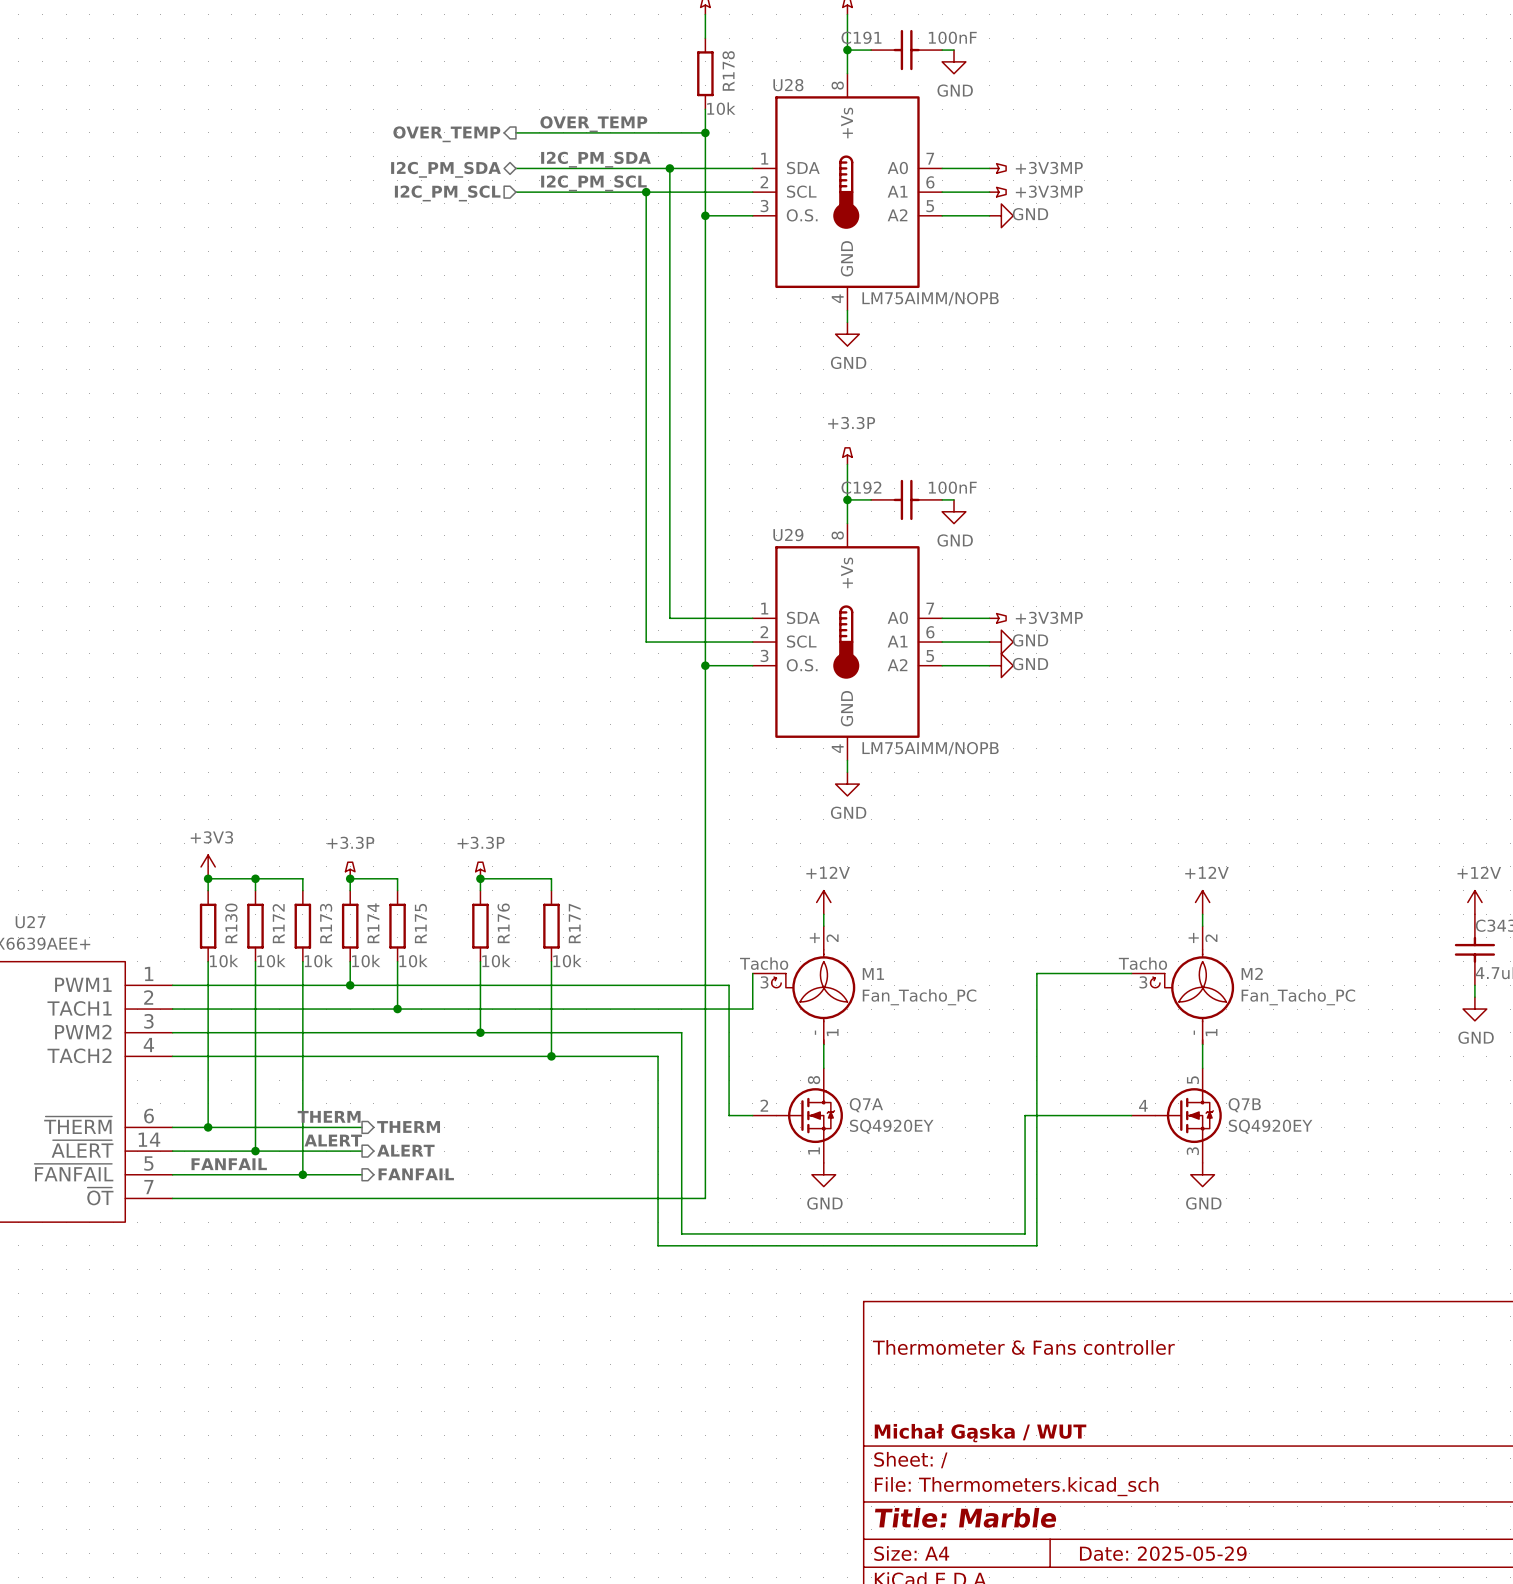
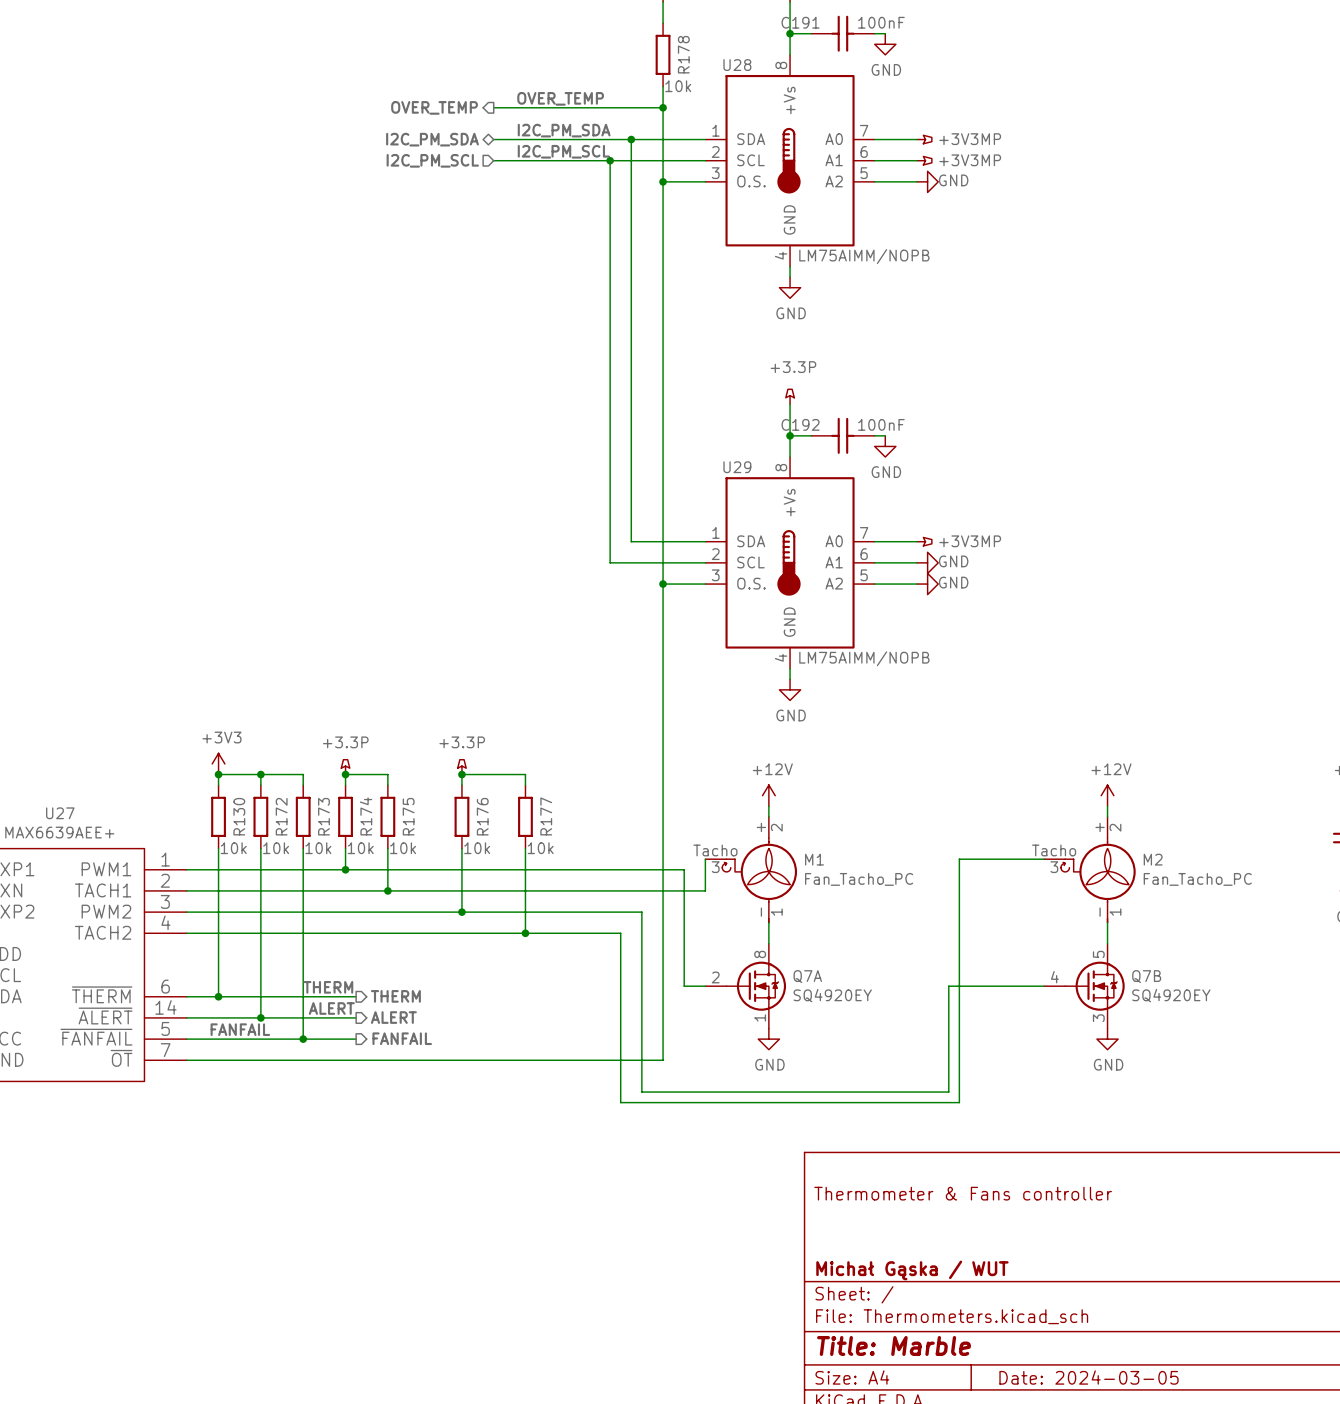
title block: Date: 2025-05-29 (1163, 1553) -> Date: 2024-03-05 (1089, 1377)

